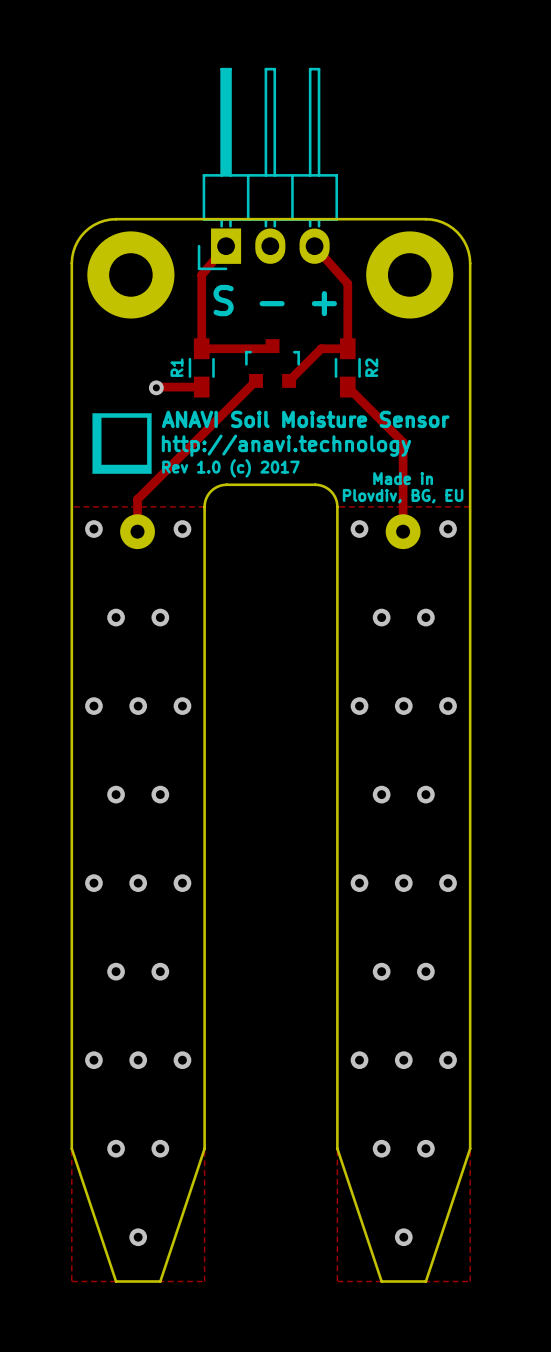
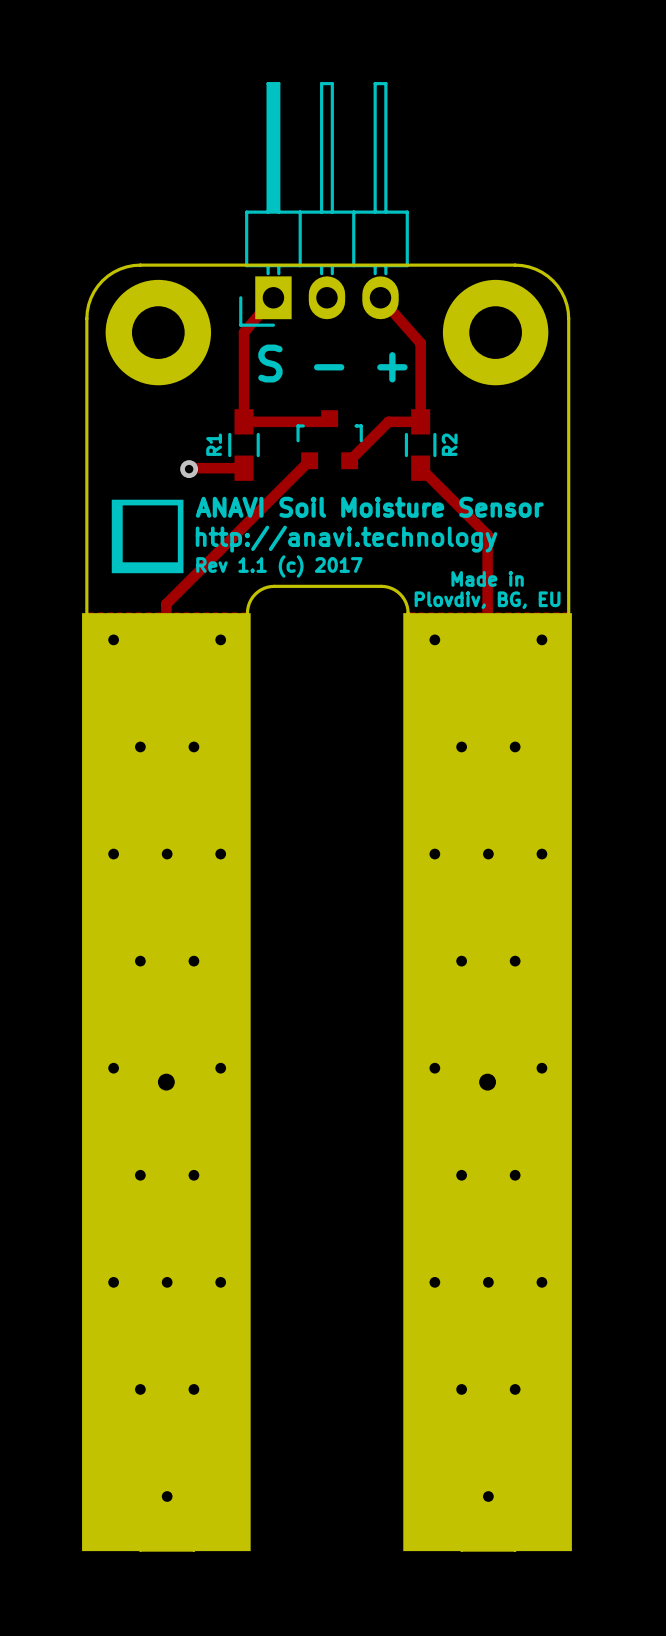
text: Rev 1.0 (c) 2017 (230, 468) -> Rev 1.1 (c) 2017 (279, 566)
part: (137, 531) -> none
part: (403, 531) -> none
via: (138, 883) -> none
via: (403, 883) -> none
part: none -> (166, 1082)
part: none -> (487, 1082)

